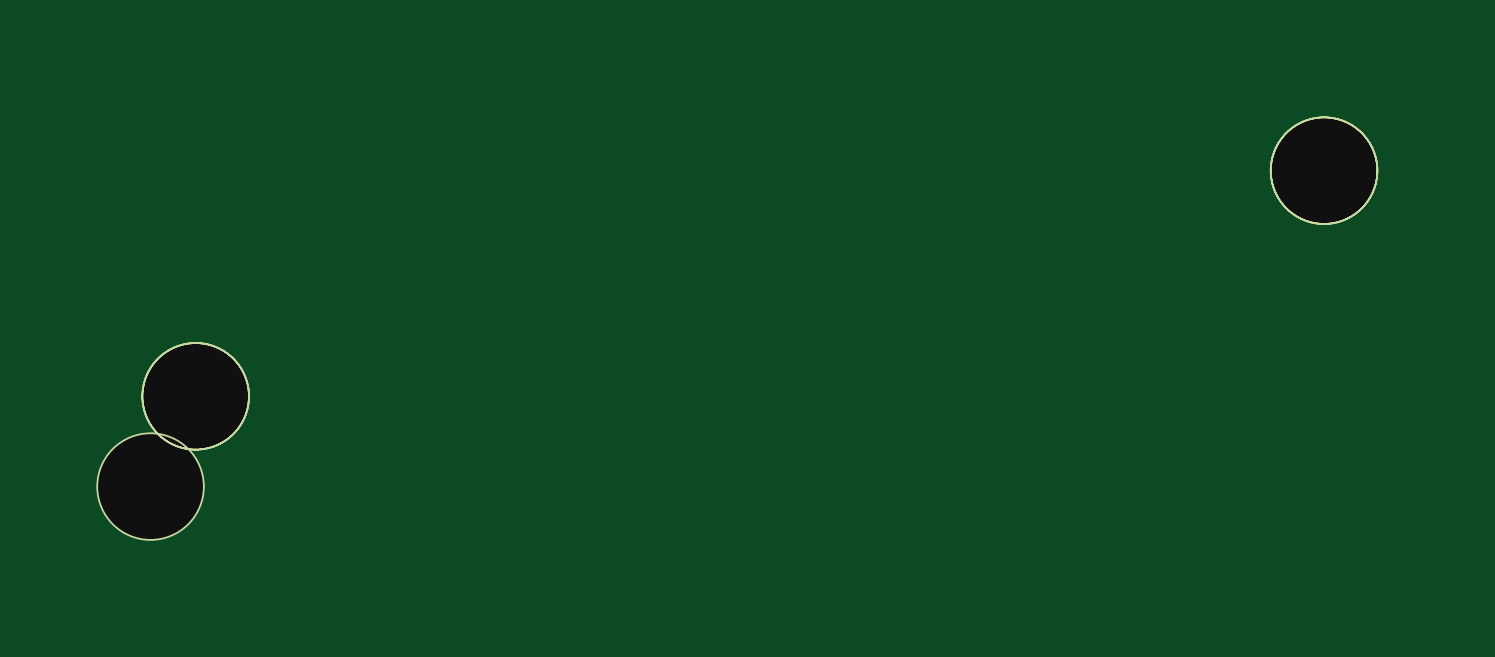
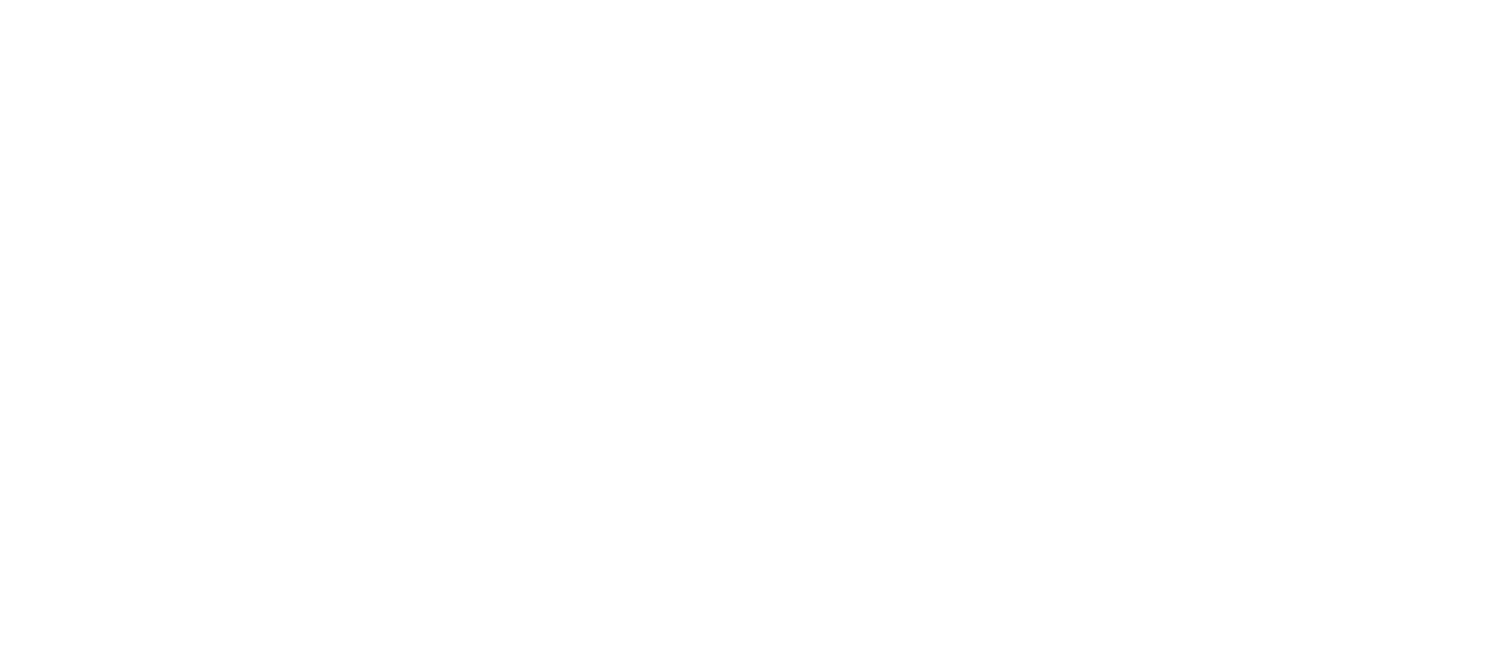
part: (1324, 170) -> none
part: (195, 396) -> none
part: (150, 486) -> none

